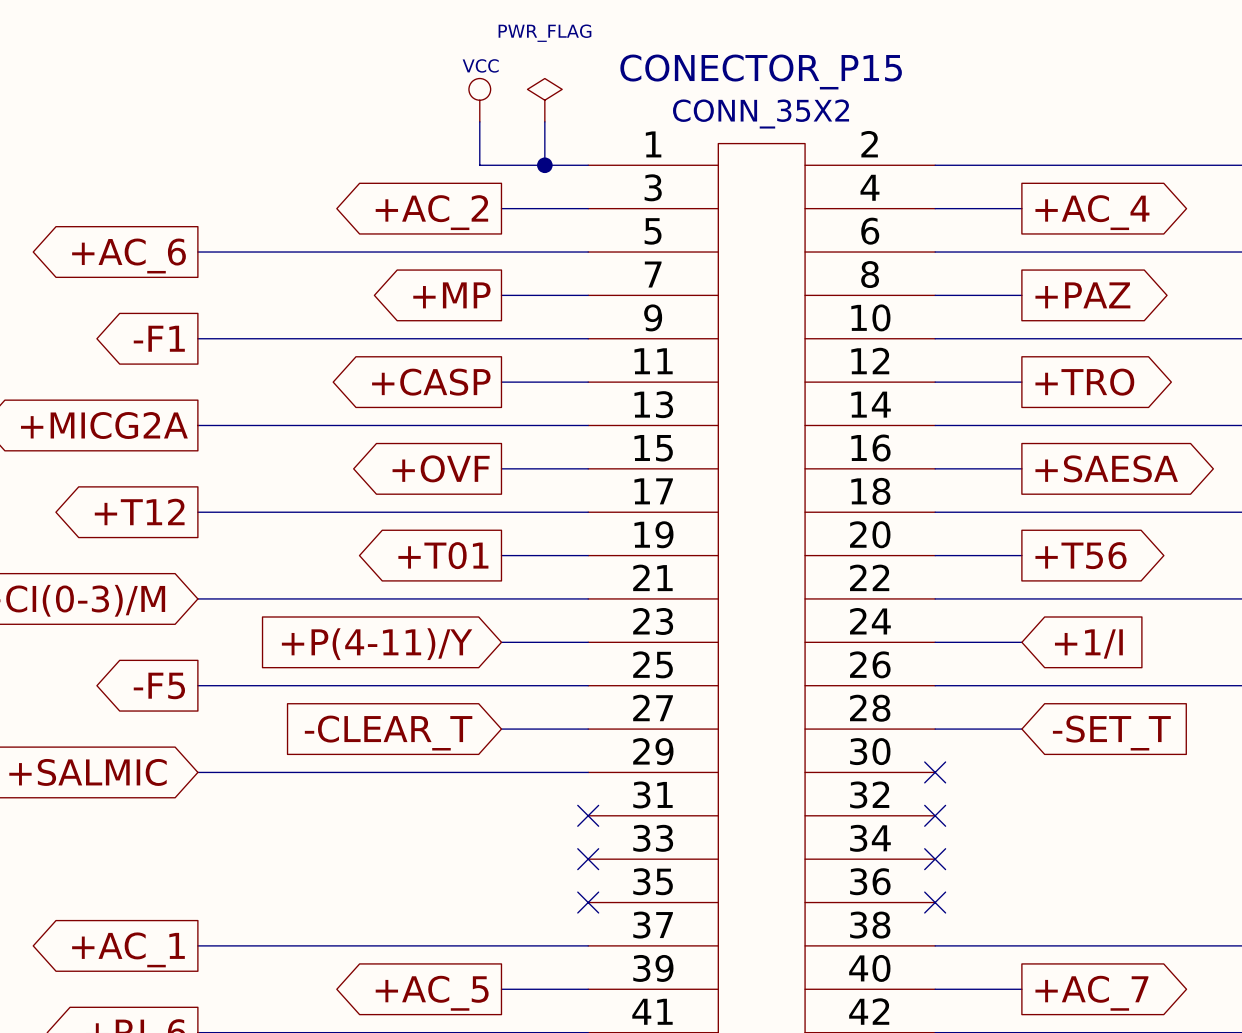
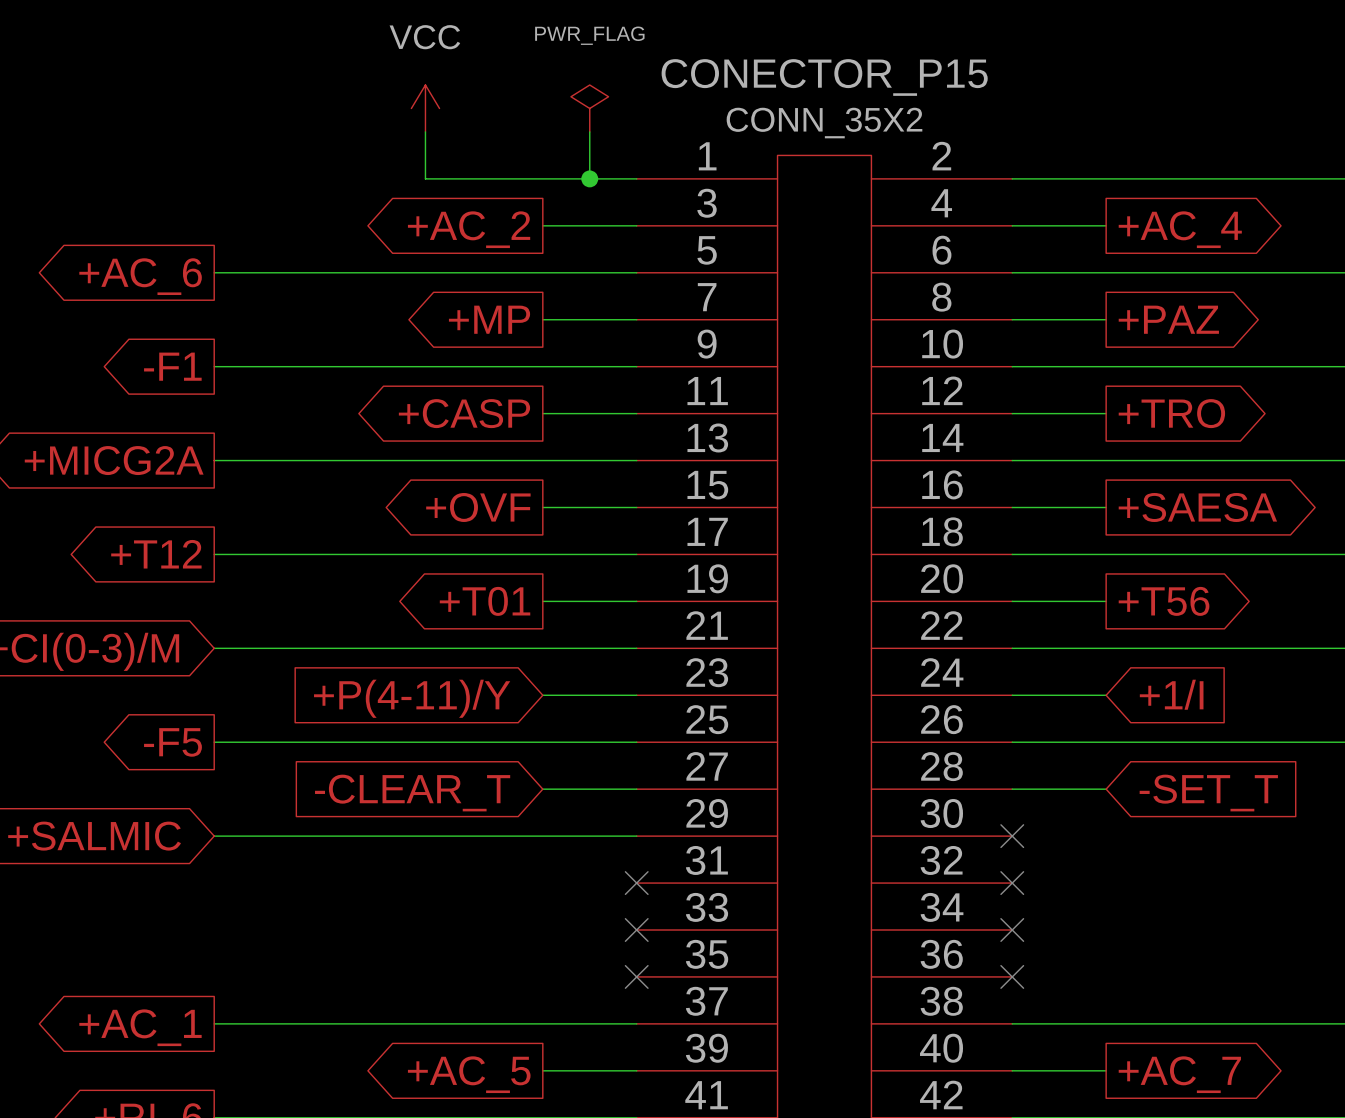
power symbol: none -> VCC (425, 108)
power symbol: VCC (479, 100) -> none
wire: (479, 121) (479, 165) -> (425, 131) (425, 178) (519, 178)

